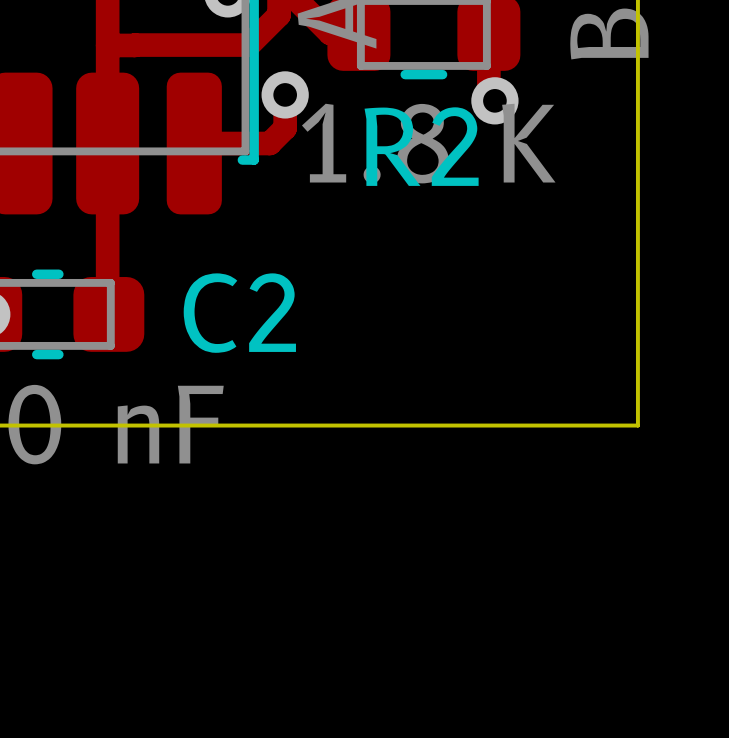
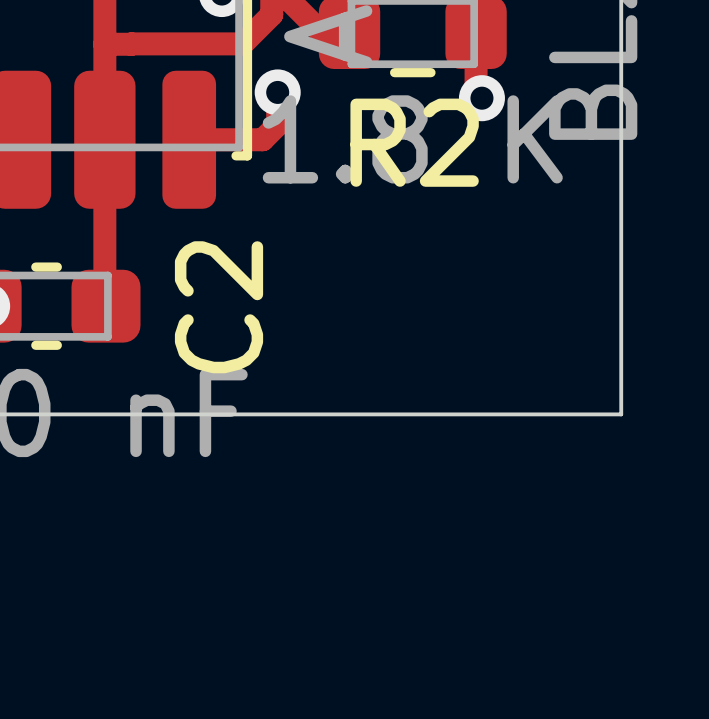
C2 name rotation: 0° (239, 313) -> 90° counterclockwise (219, 307)

